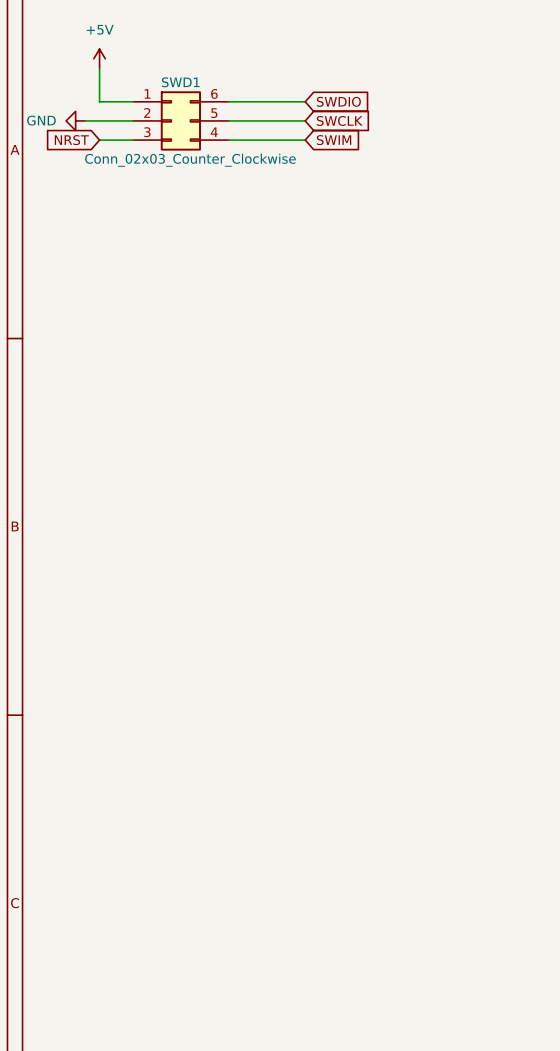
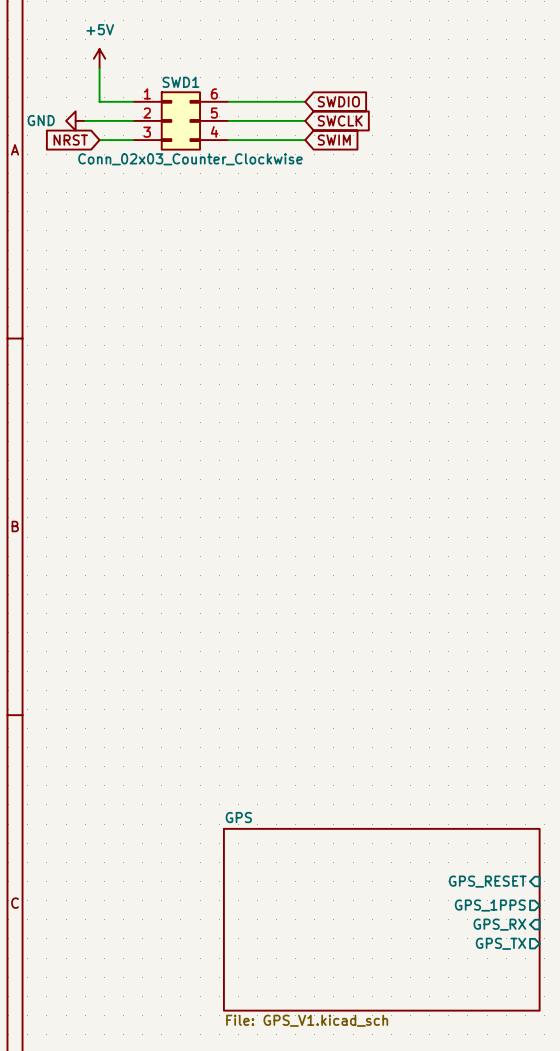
sheet pin: none -> GPS_RESET (487, 881)
sheet pin: none -> GPS_1PPS (490, 905)
sheet GPS: none -> File: GPS_V1.kicad_sch (381, 919)
sheet pin: none -> GPS_RX (499, 924)
sheet pin: none -> GPS_TX (500, 943)

